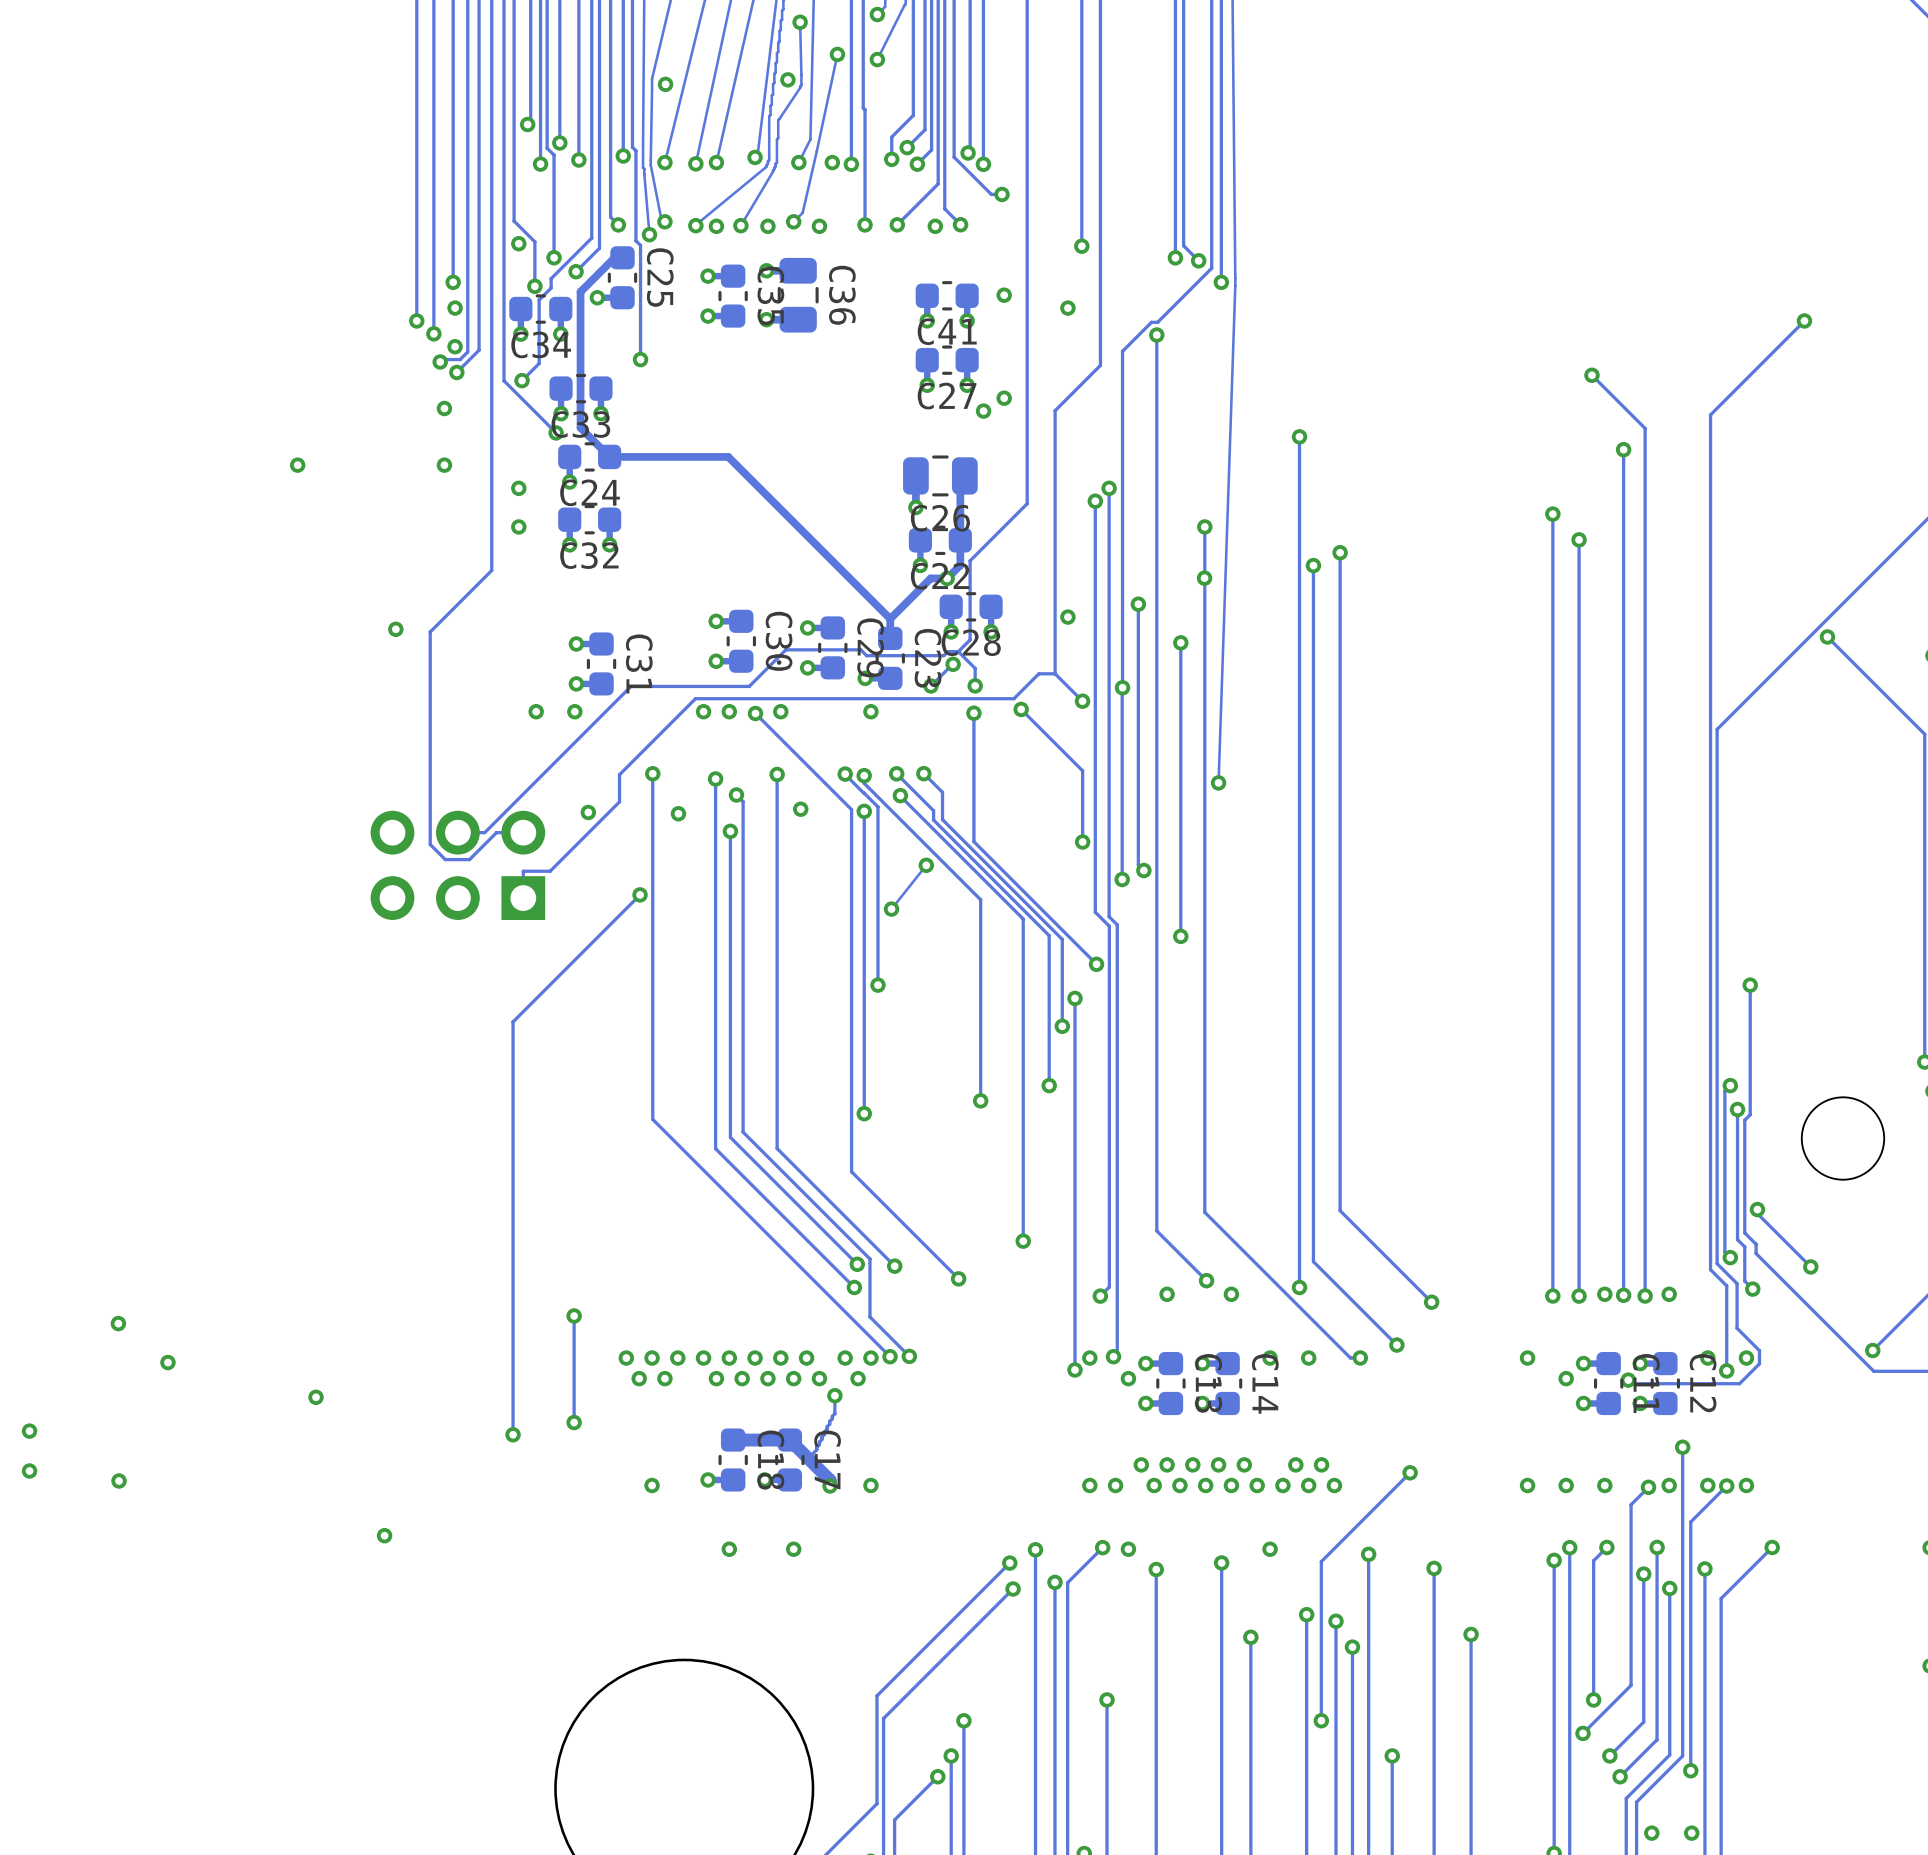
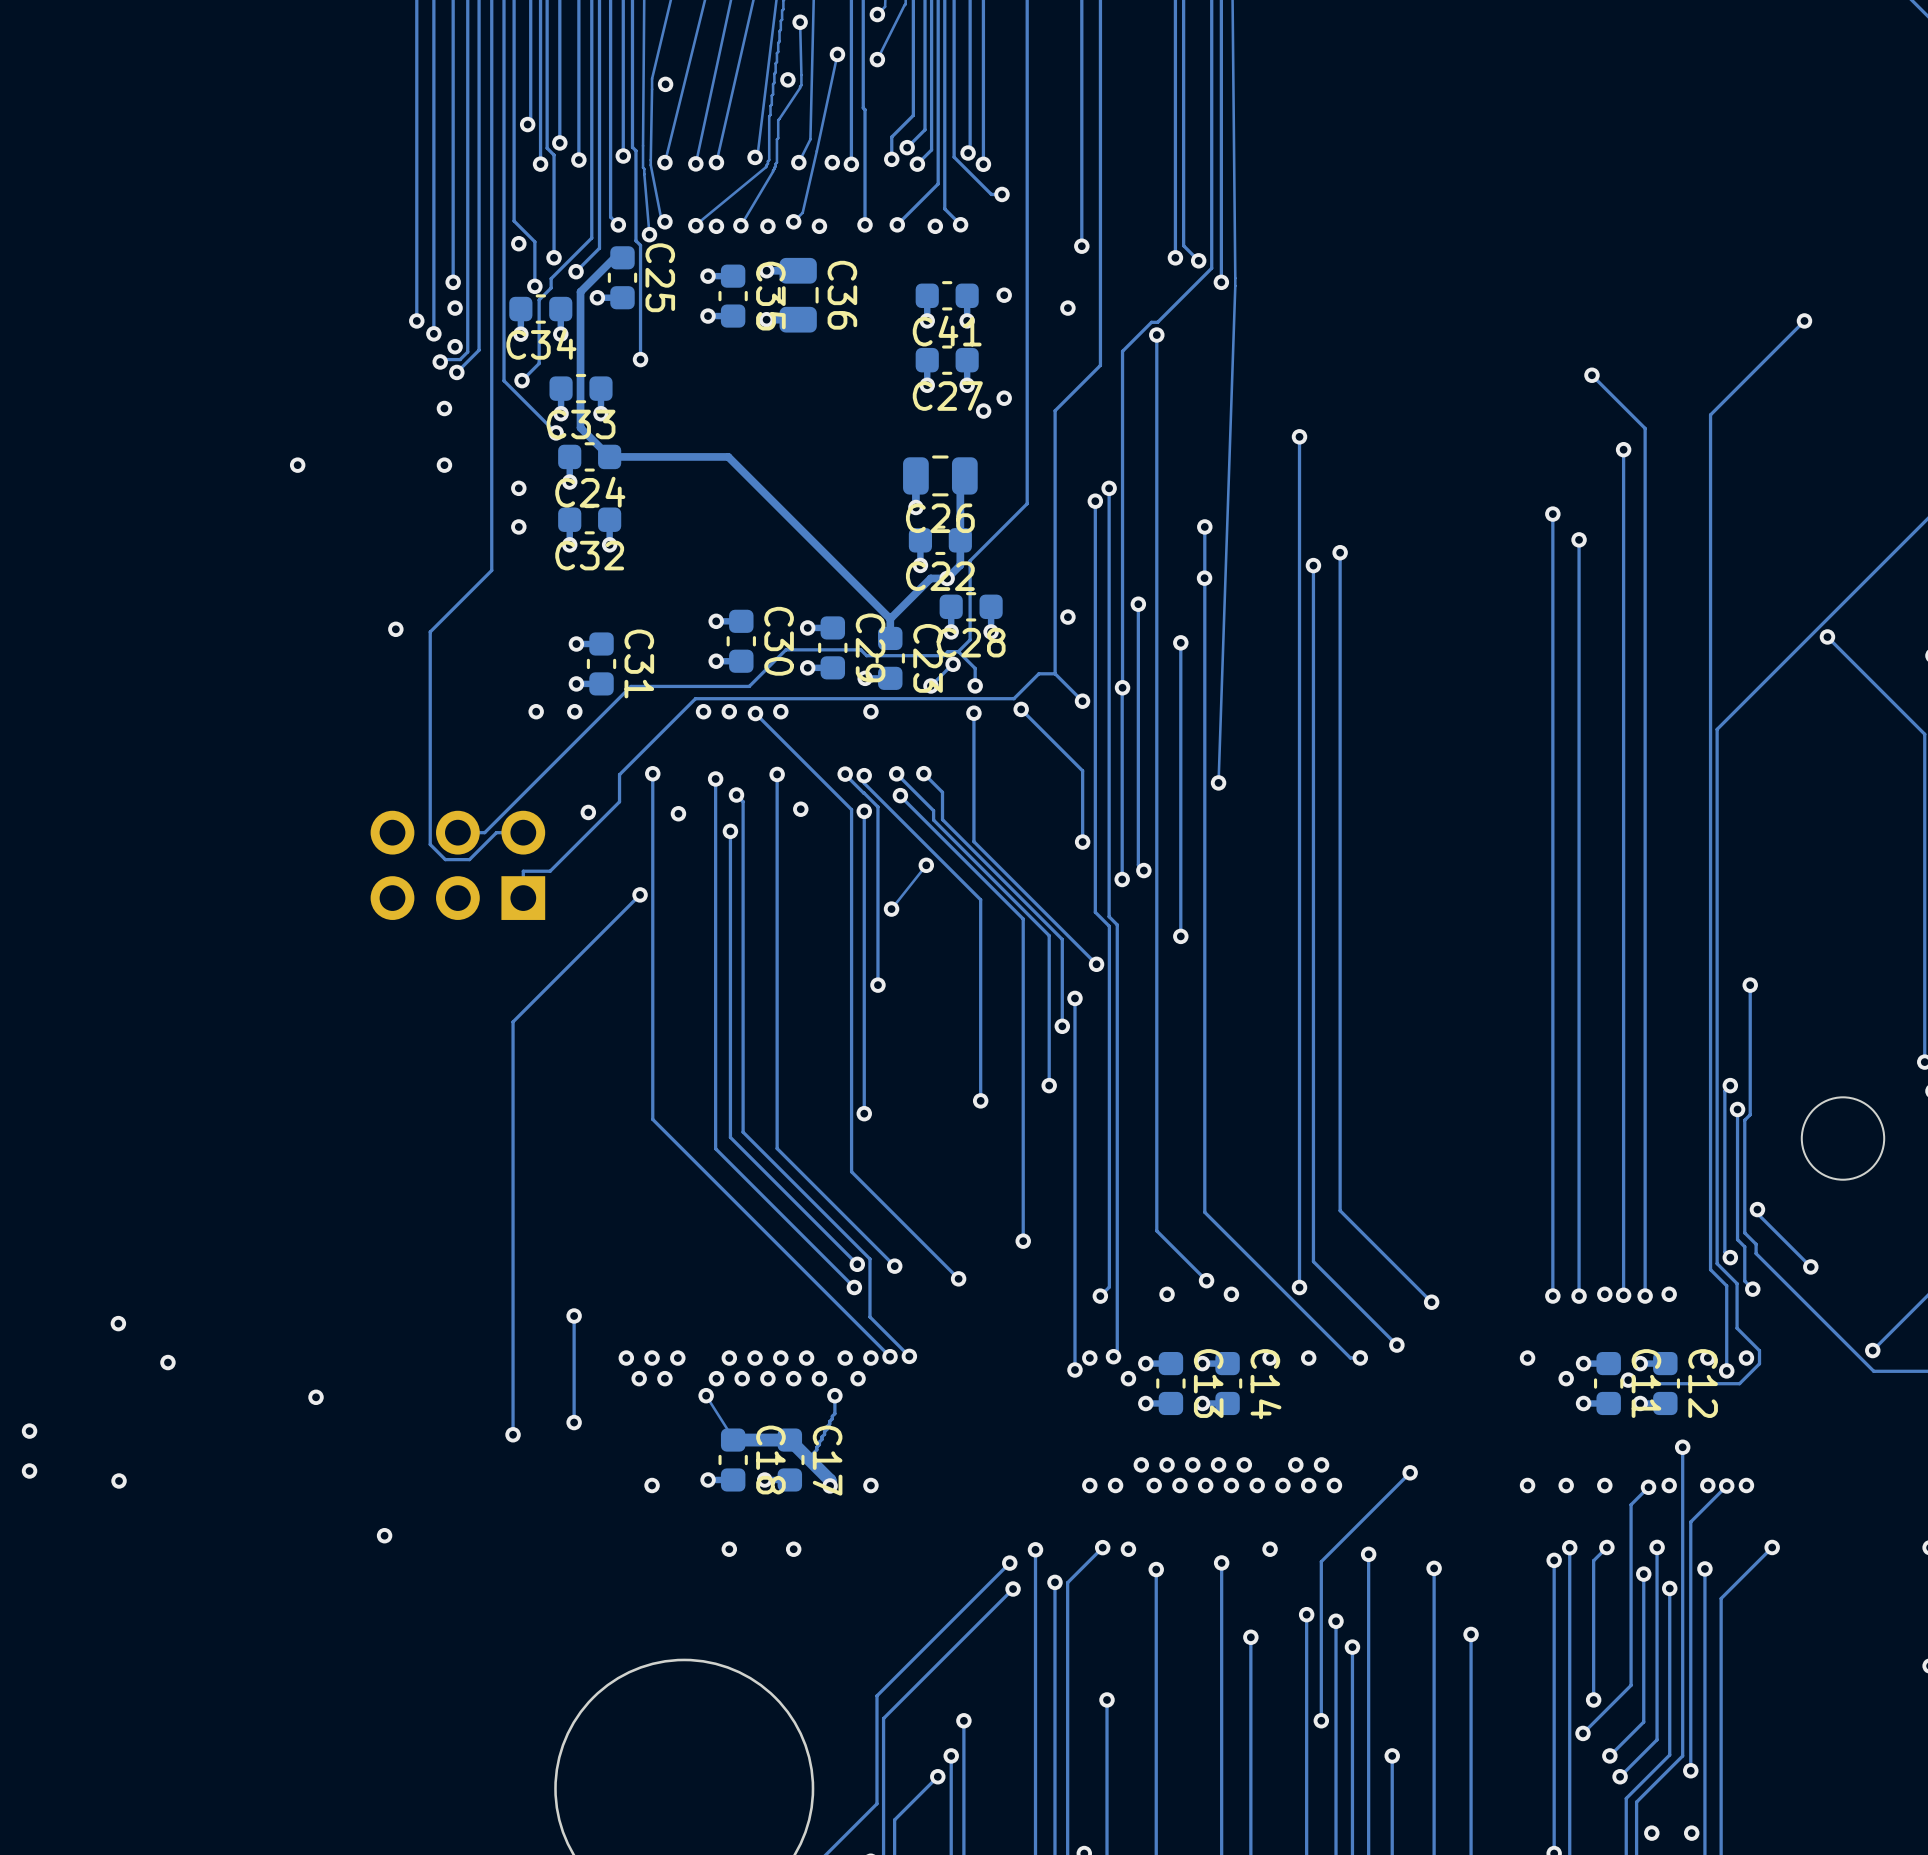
via position: (703, 1358) -> (706, 1395)
track: none -> (706, 1395) (730, 1434)

